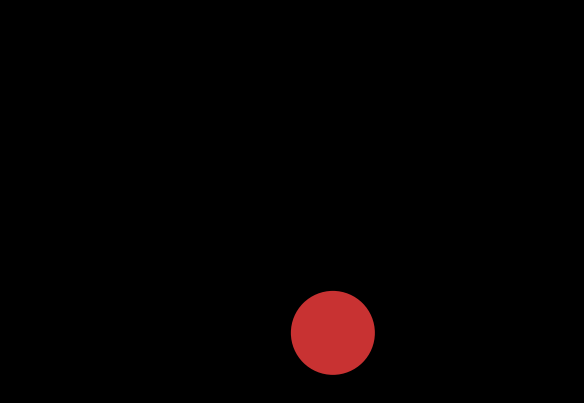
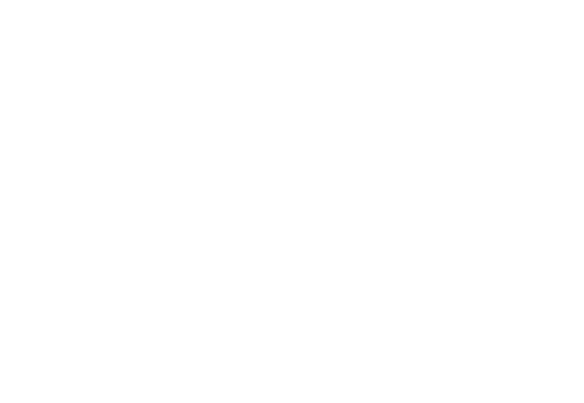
part: (332, 332) -> none

